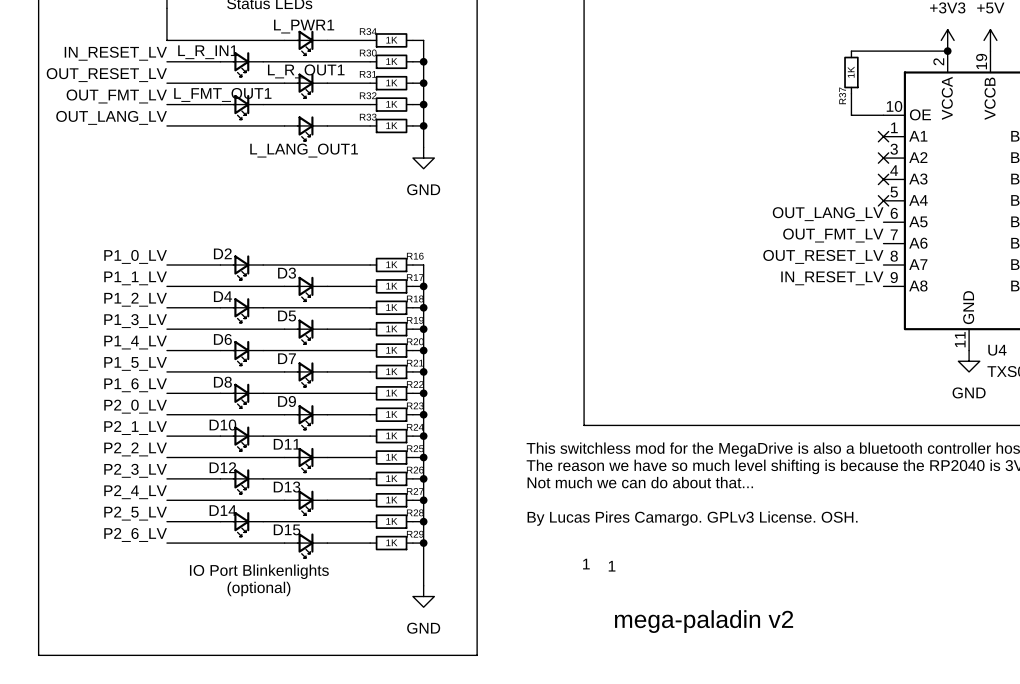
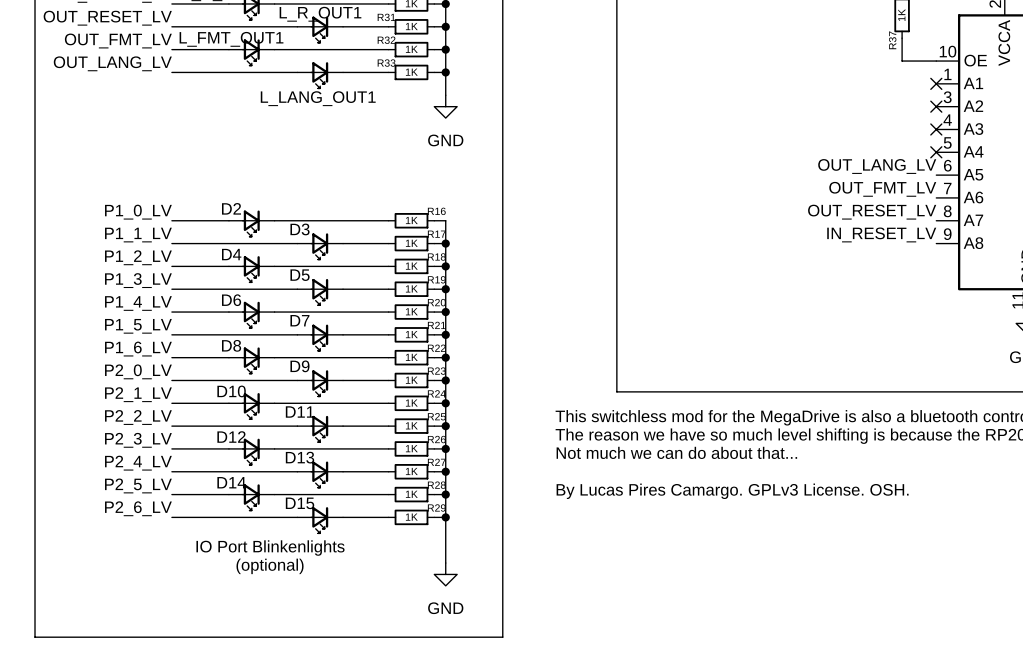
text: 1 (586, 564) -> none
text: 1 (612, 566) -> none
text: mega-paladin v2 (704, 621) -> none

